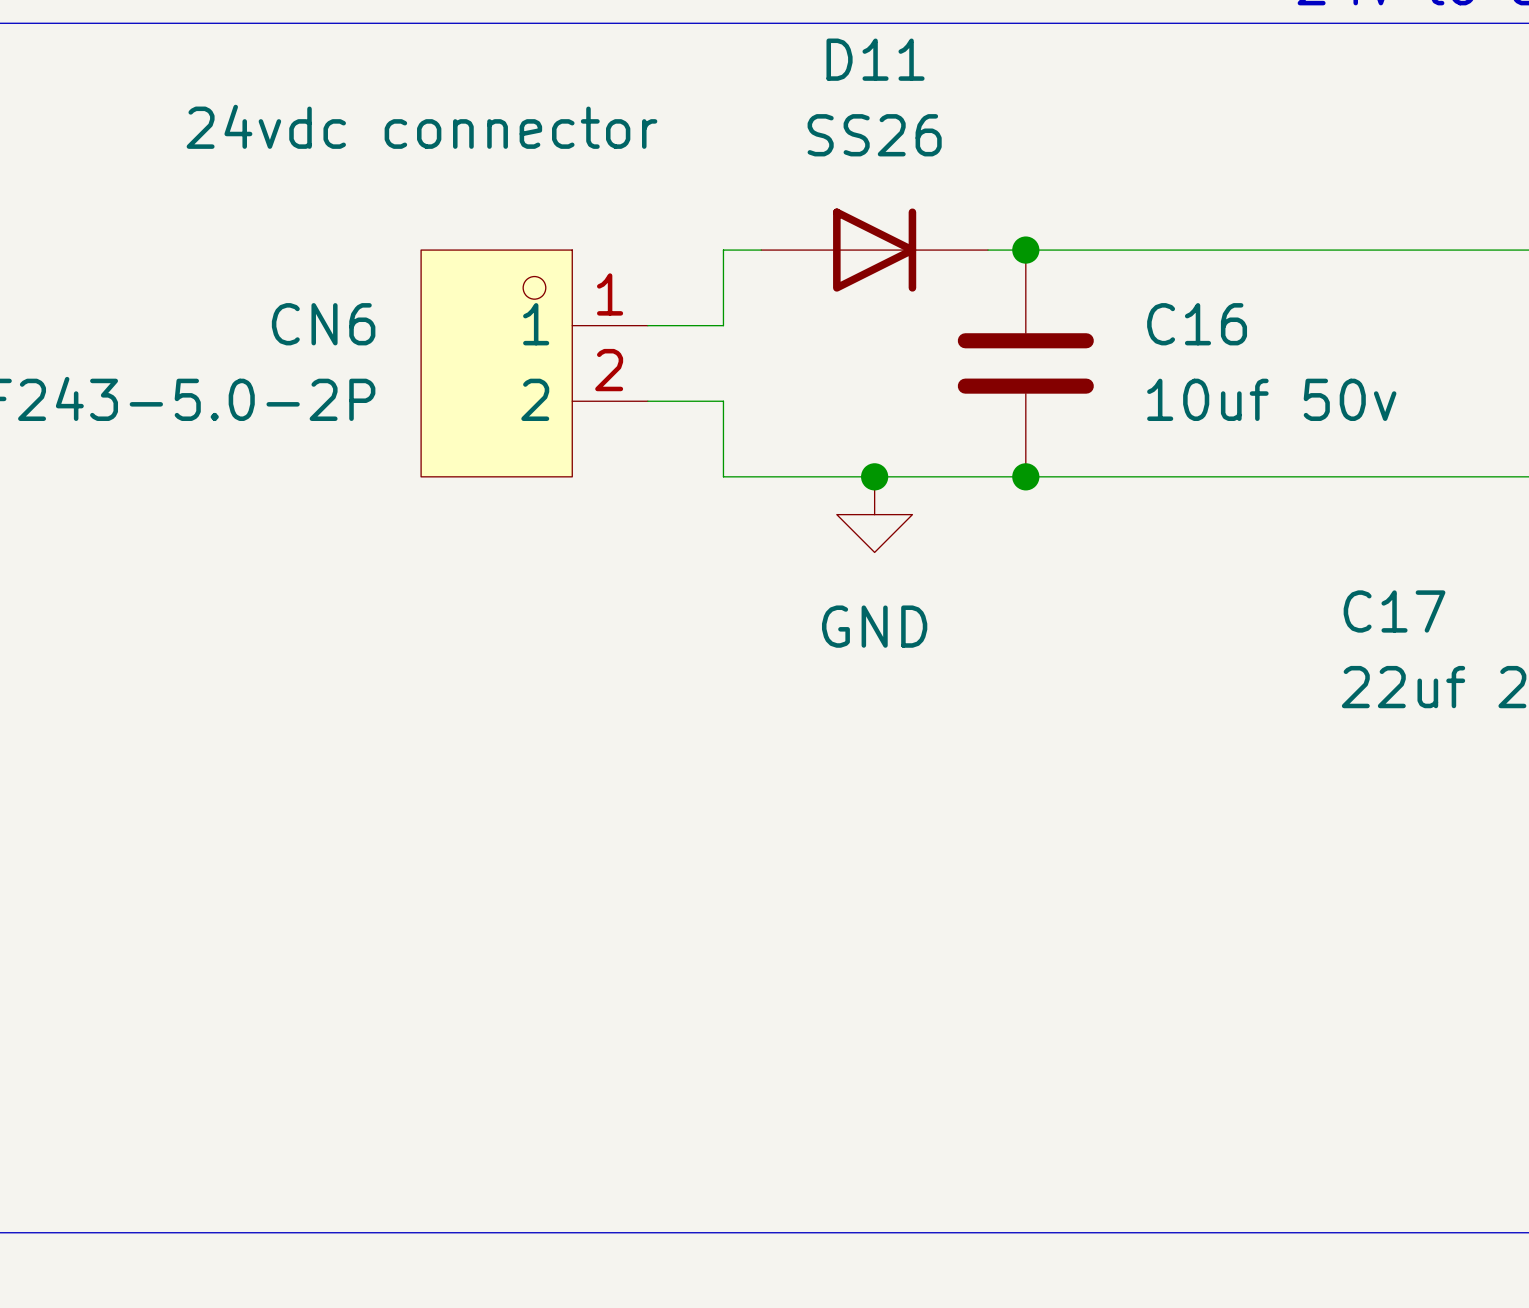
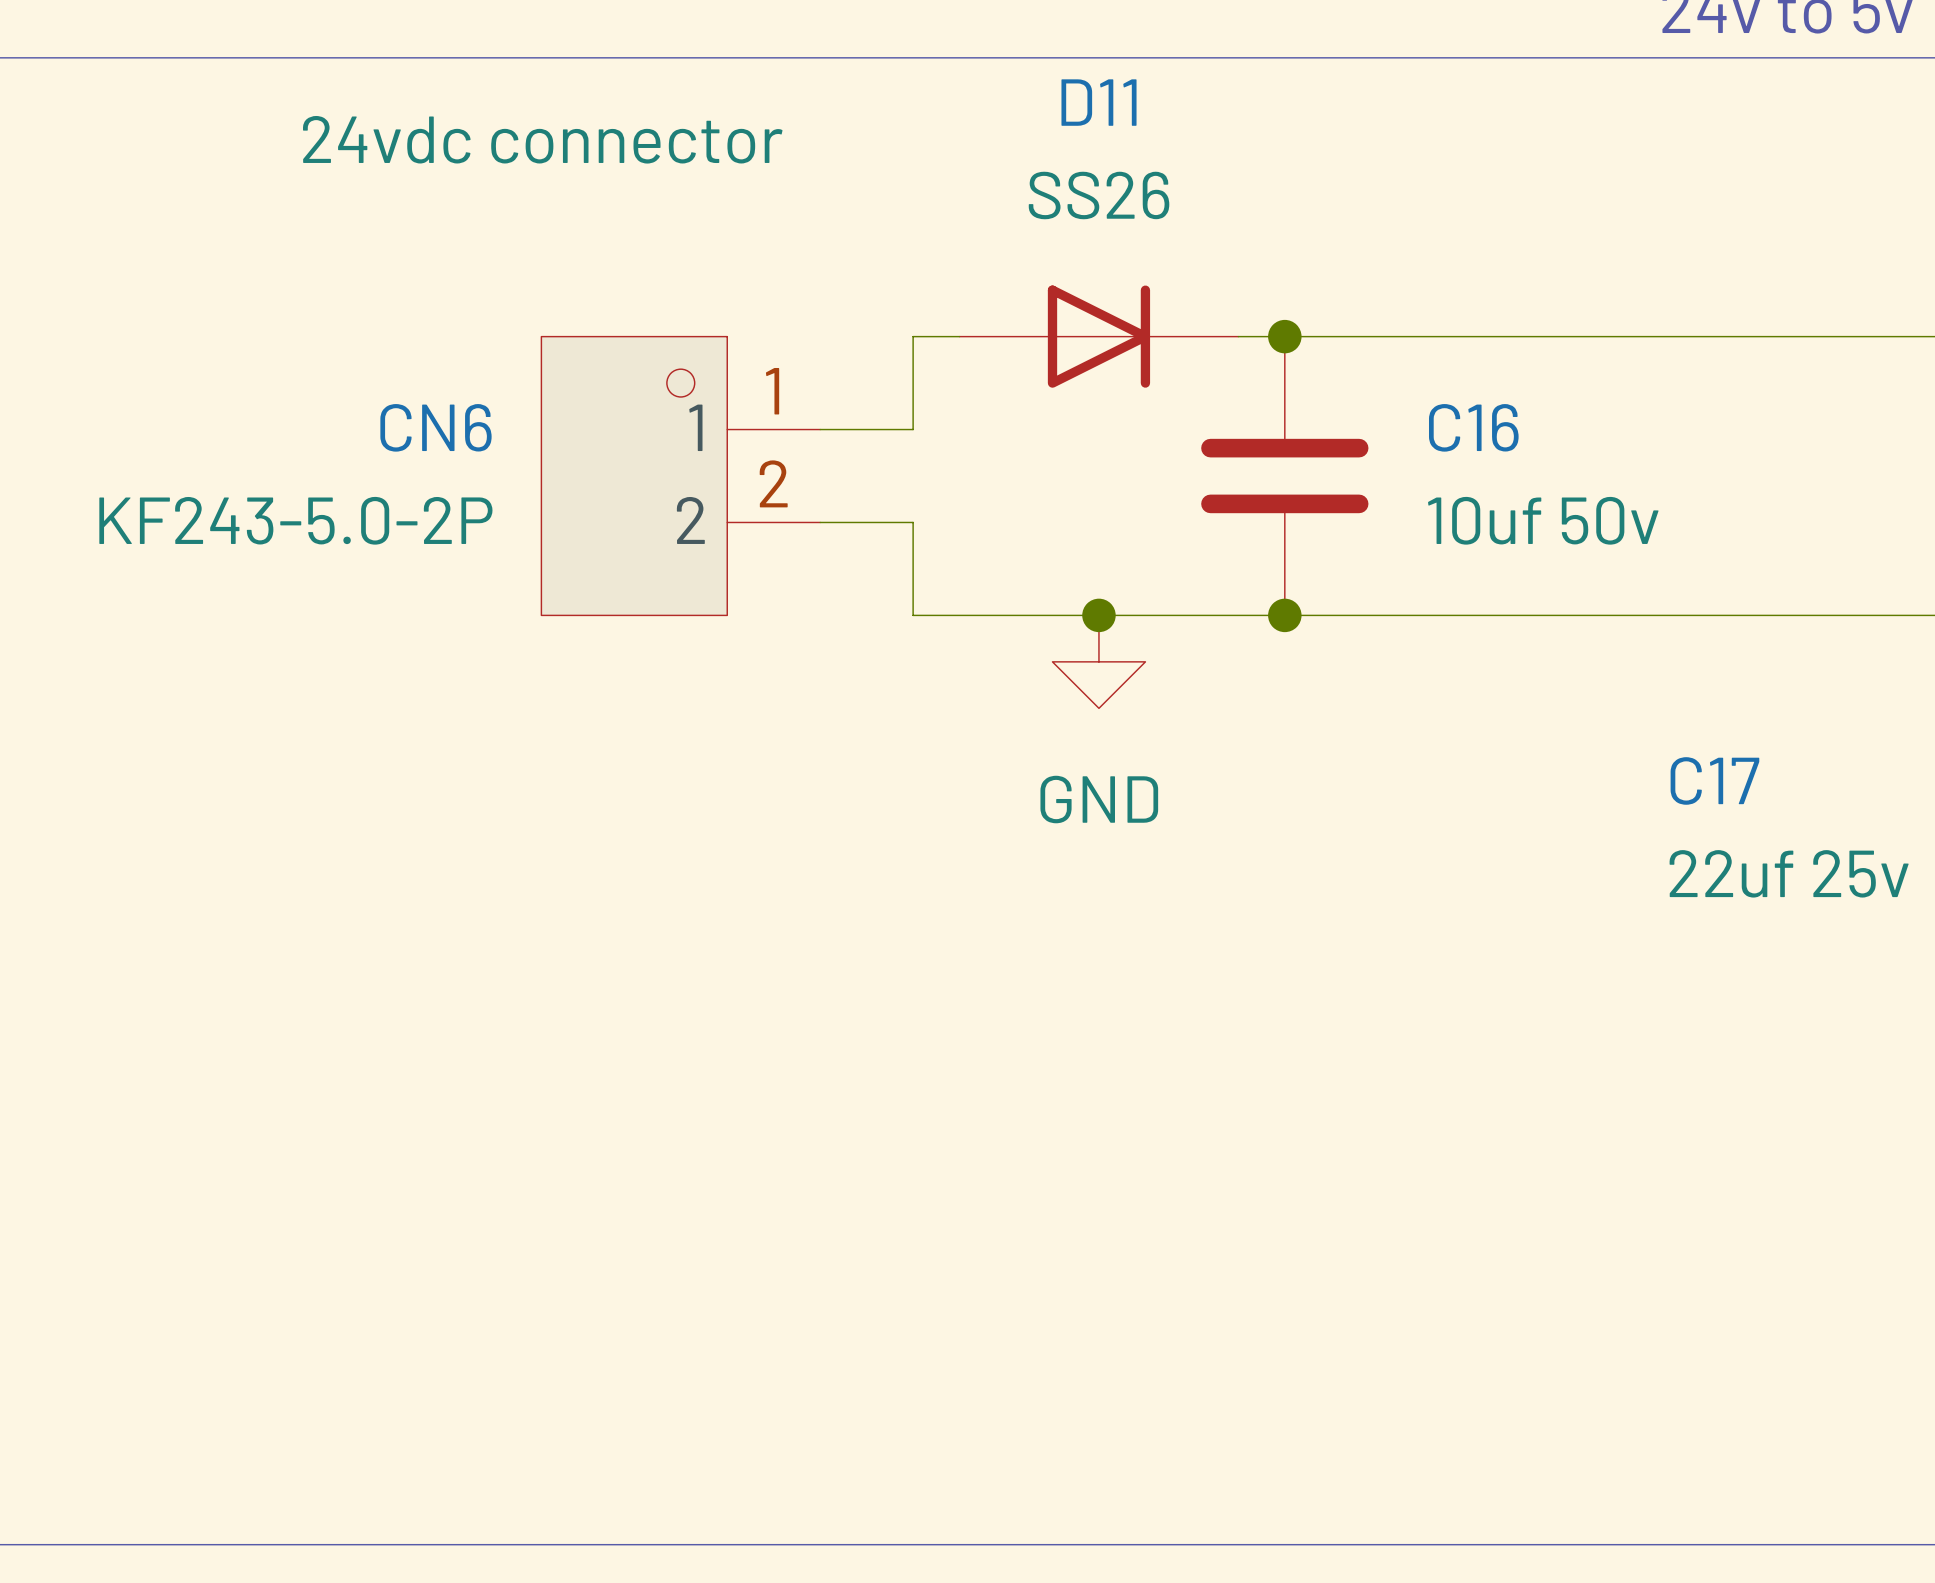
CN6 text position: 24vdc connector (421, 126) -> 24vdc connector (542, 139)

